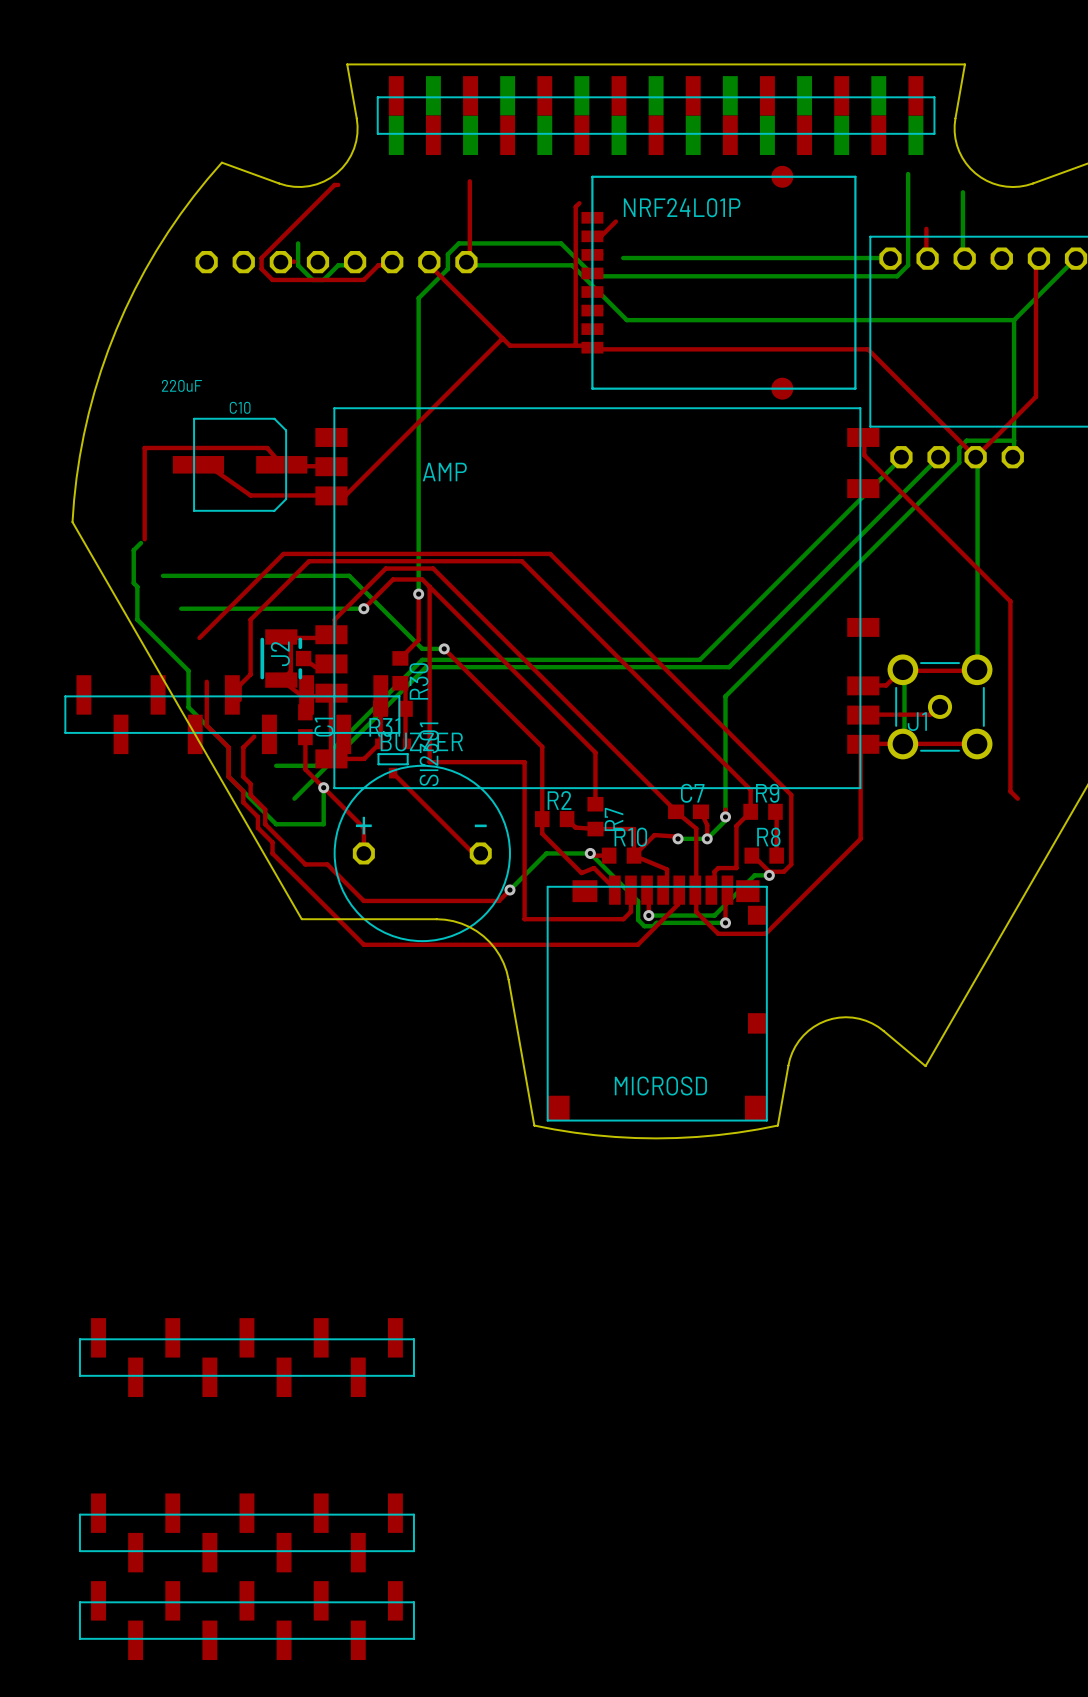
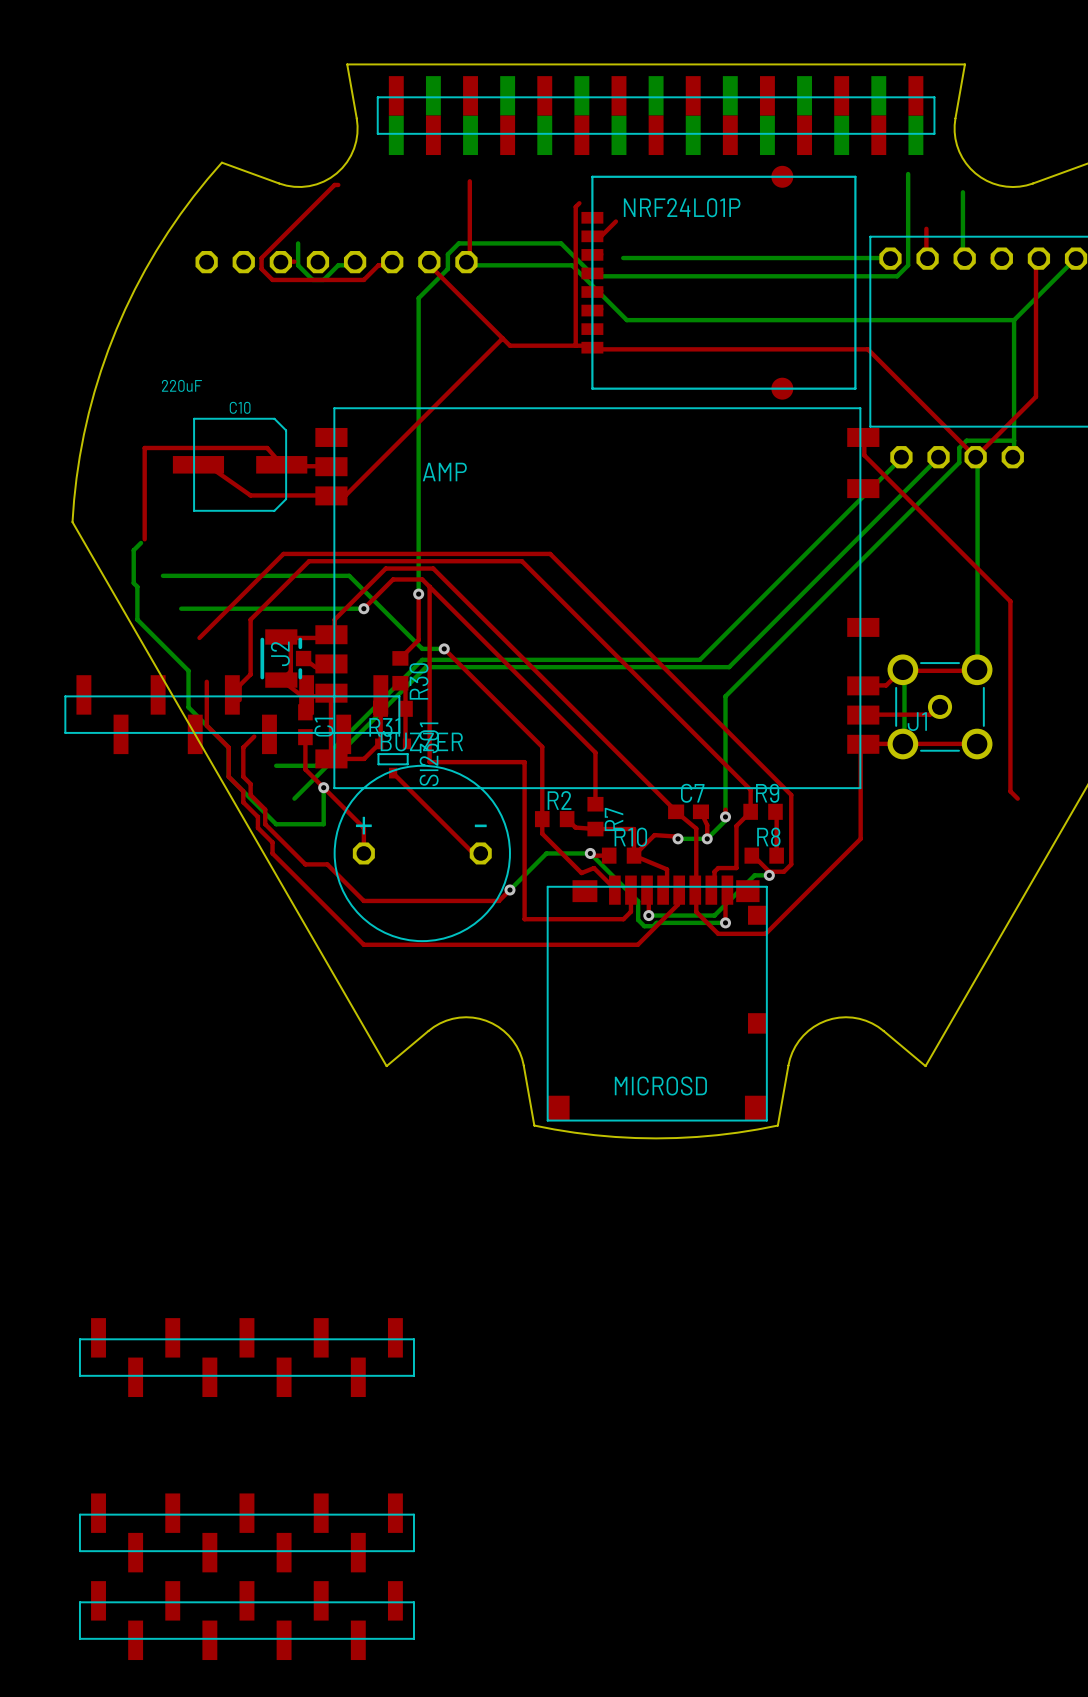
board edge: (301, 919) (445, 919) (461, 923) (476, 931) (495, 948) (506, 971) (523, 1065) -> (301, 919) (386, 1066) (434, 1026) (446, 1020) (466, 1017) (486, 1020) (503, 1030) (516, 1046) (523, 1065)

